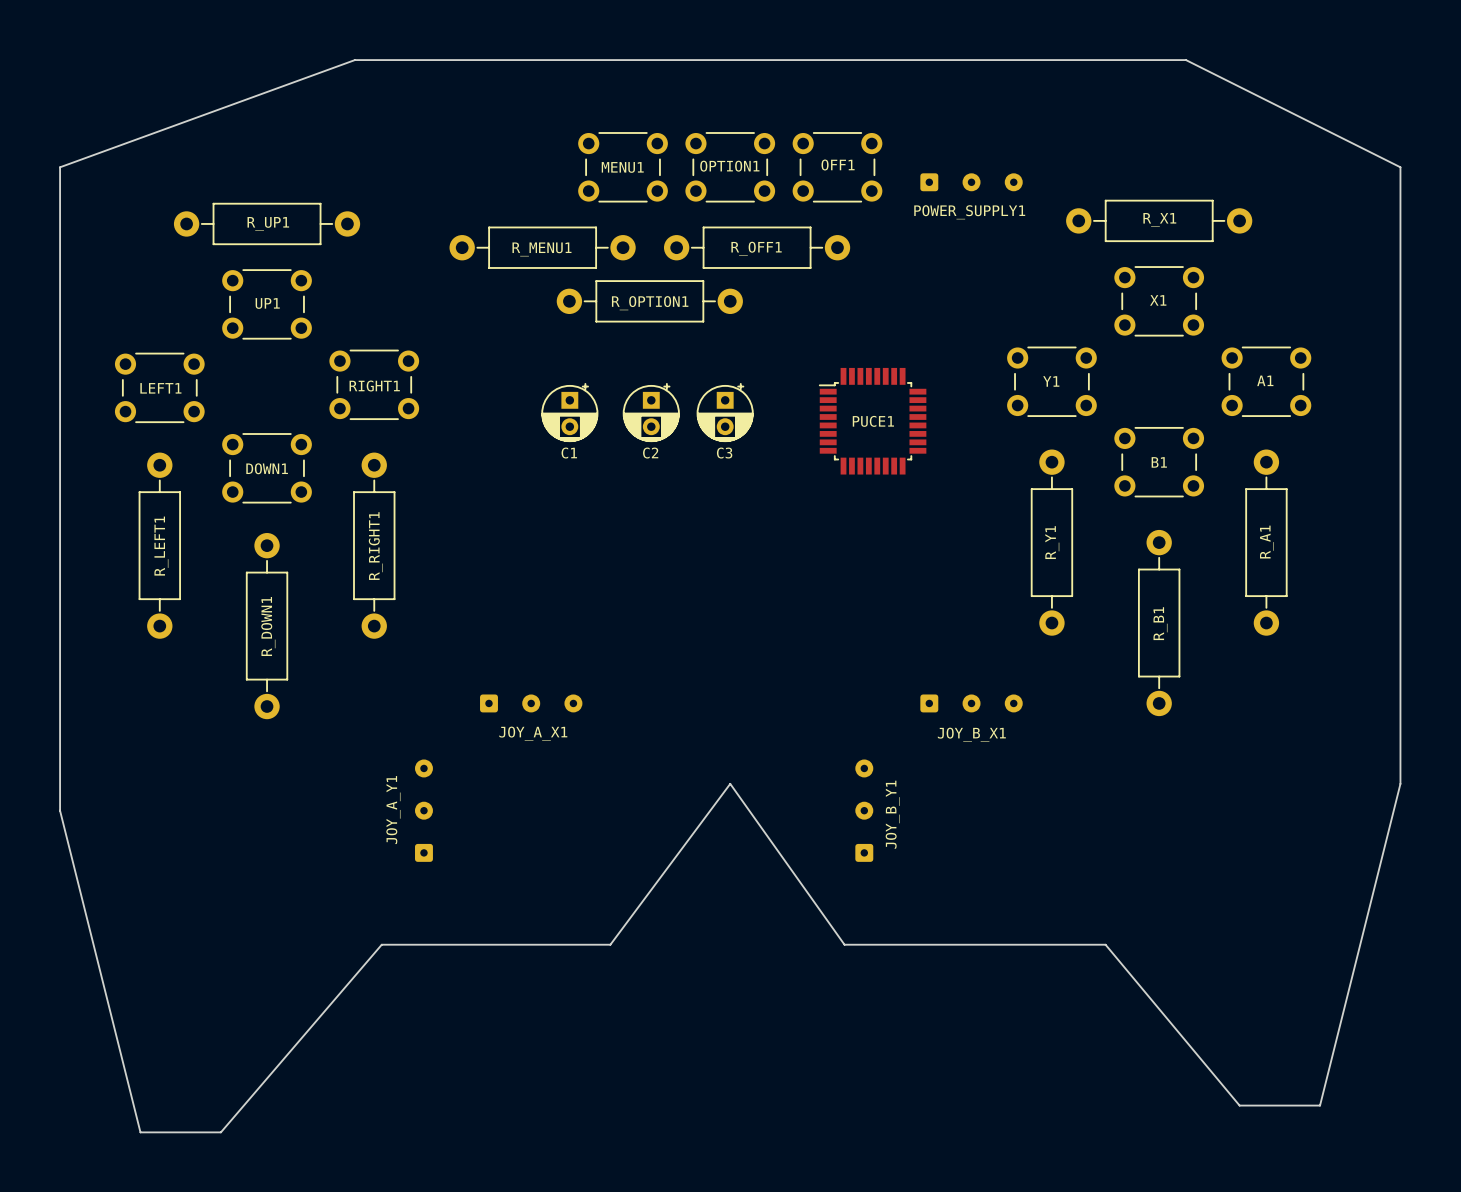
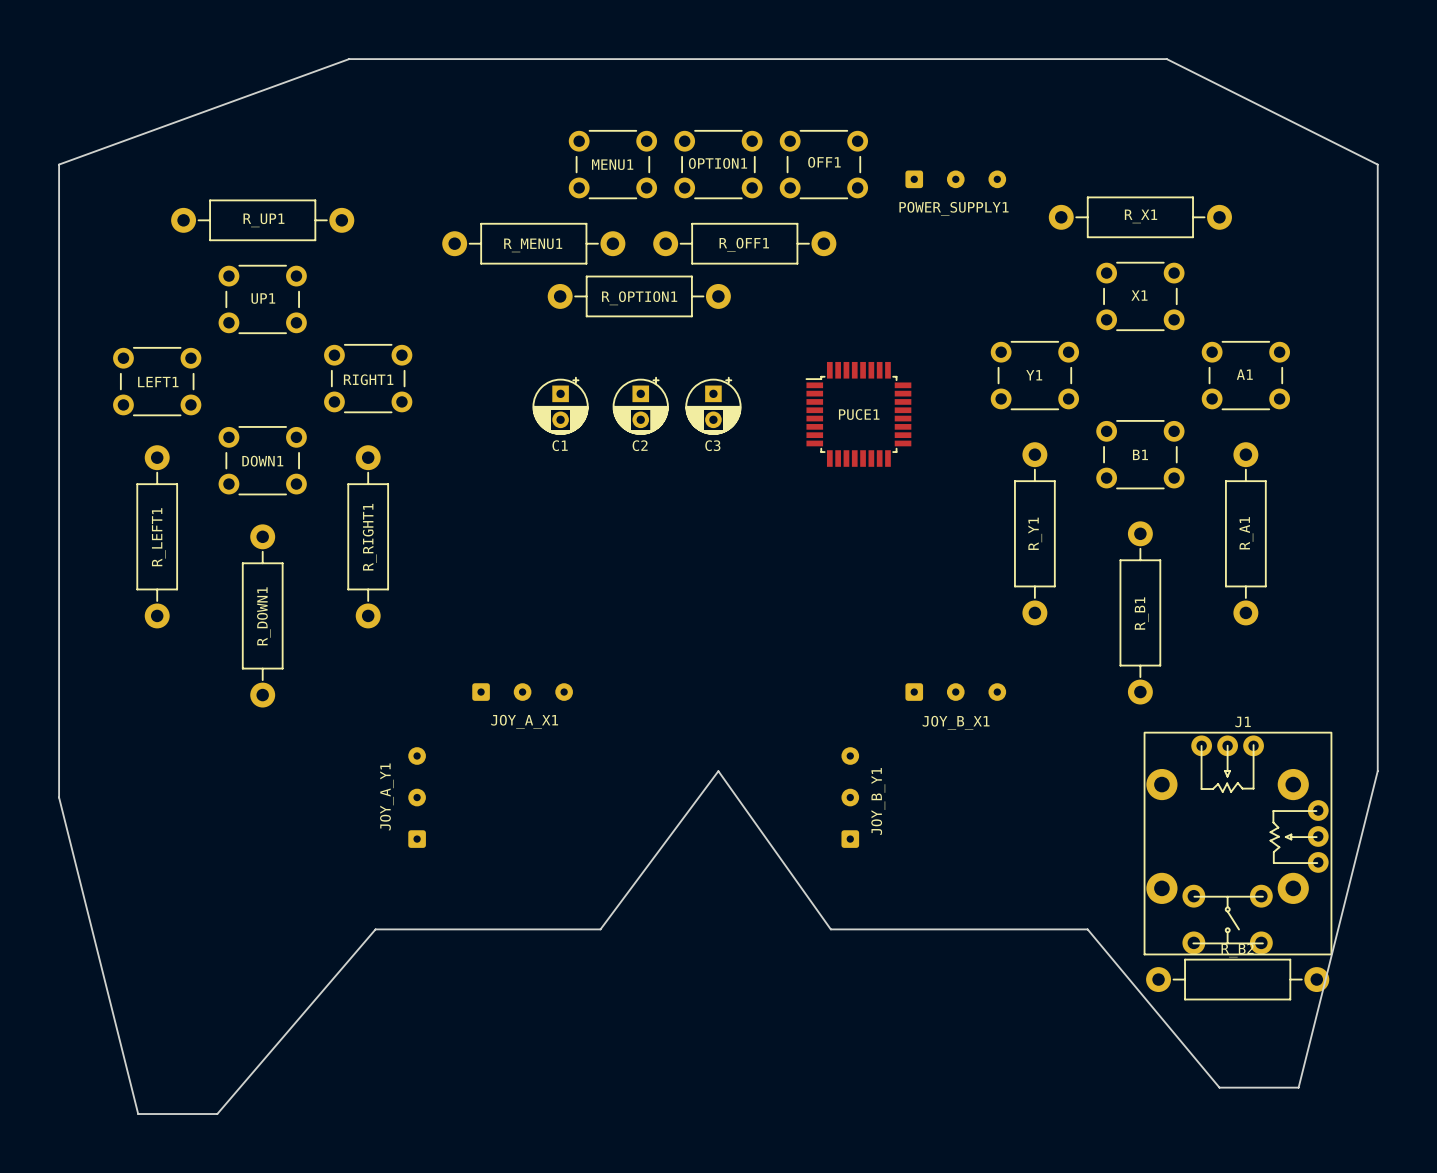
J1: none -> (1237, 843)
R_B2: none -> (1237, 979)

